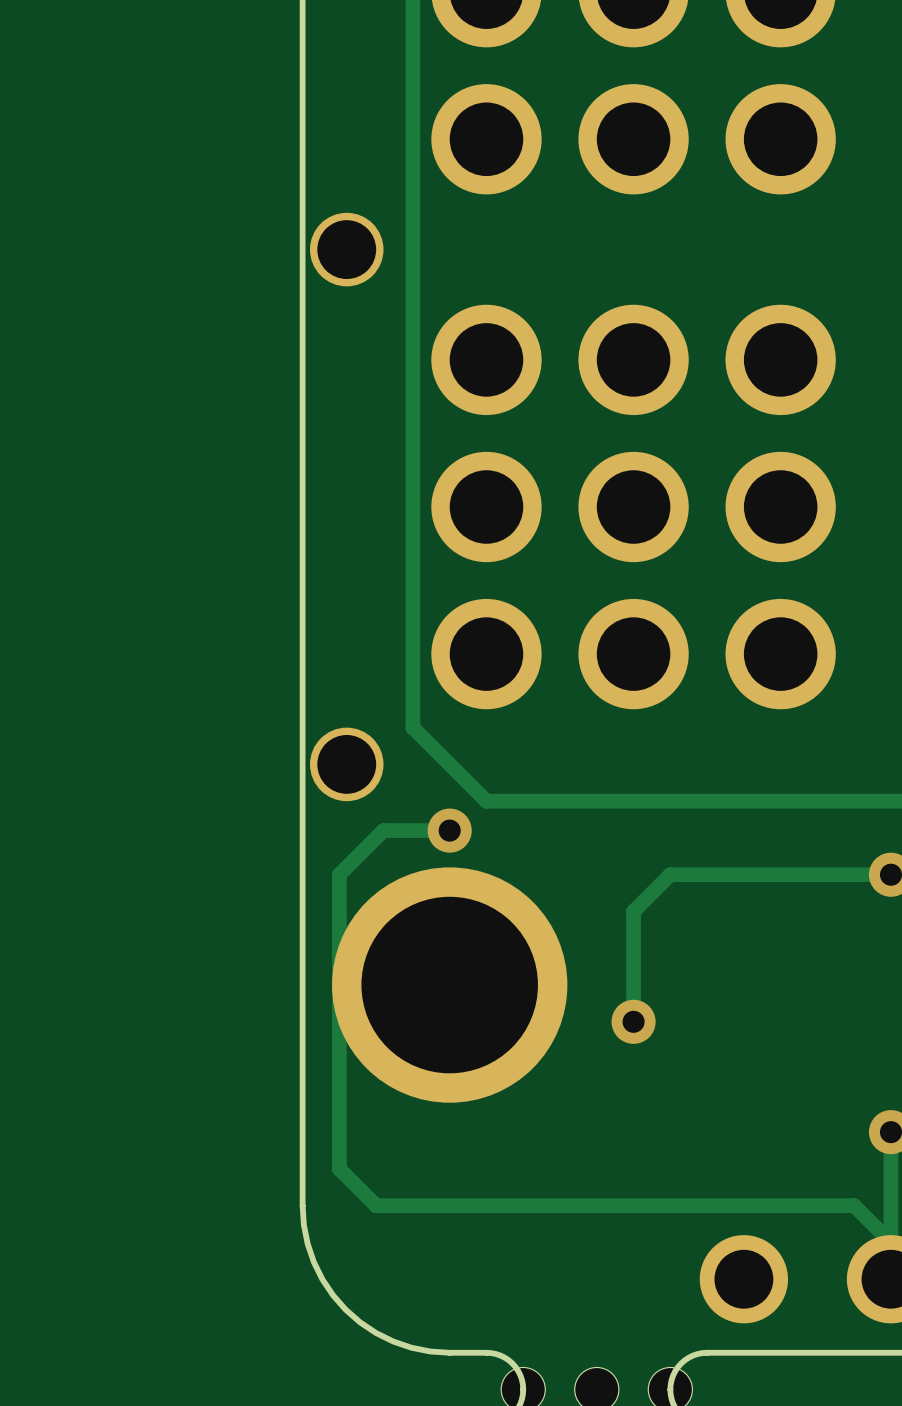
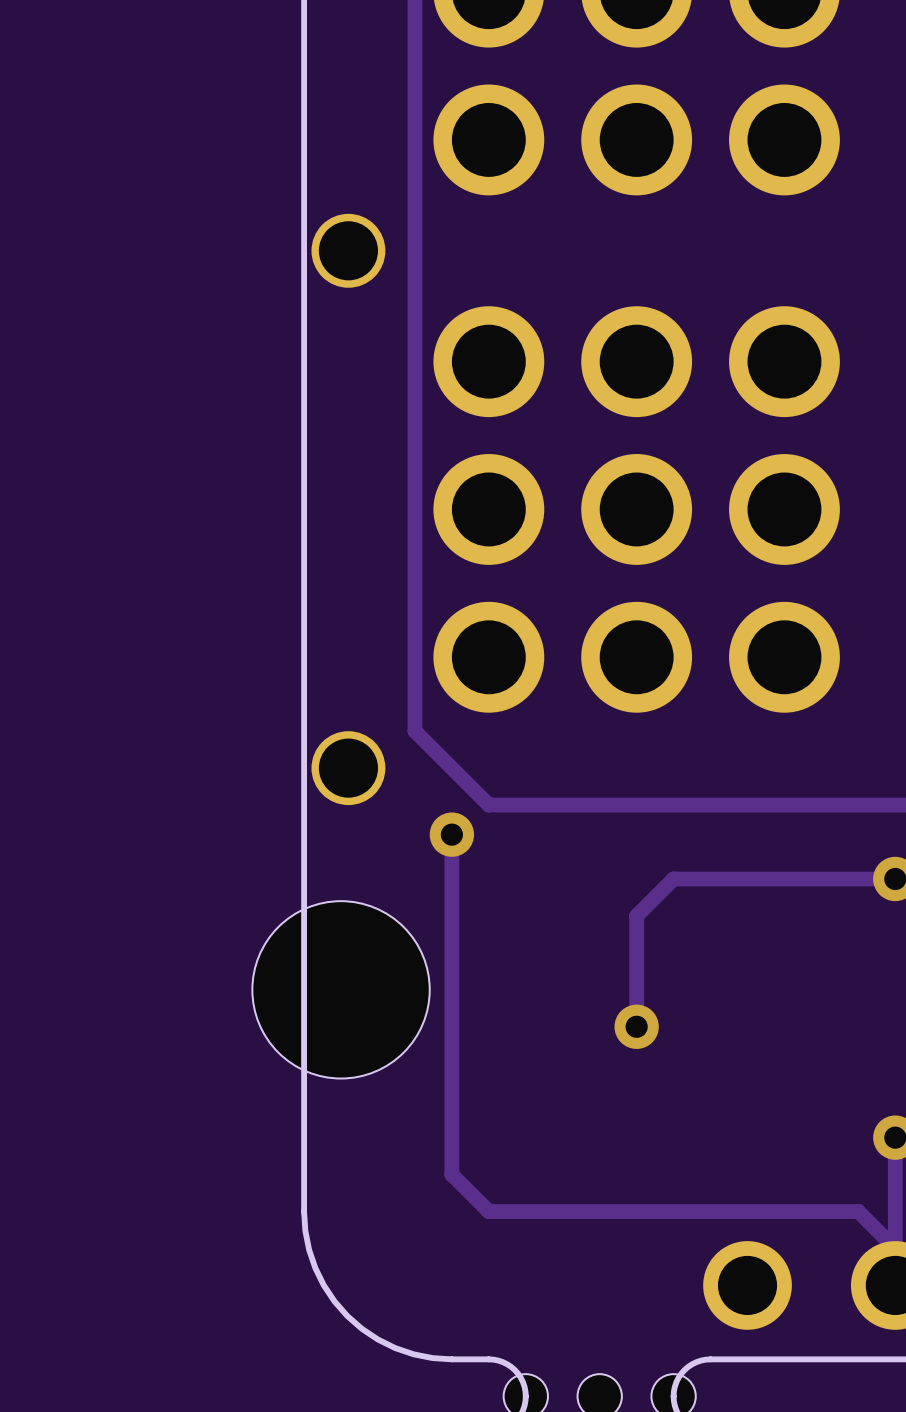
track: (449, 830) (383, 830) (339, 874) (339, 1168) (376, 1205) (486, 1205) -> (451, 834) (451, 1174) (488, 1211)
part: none -> (341, 989)
part: (449, 985) -> none

